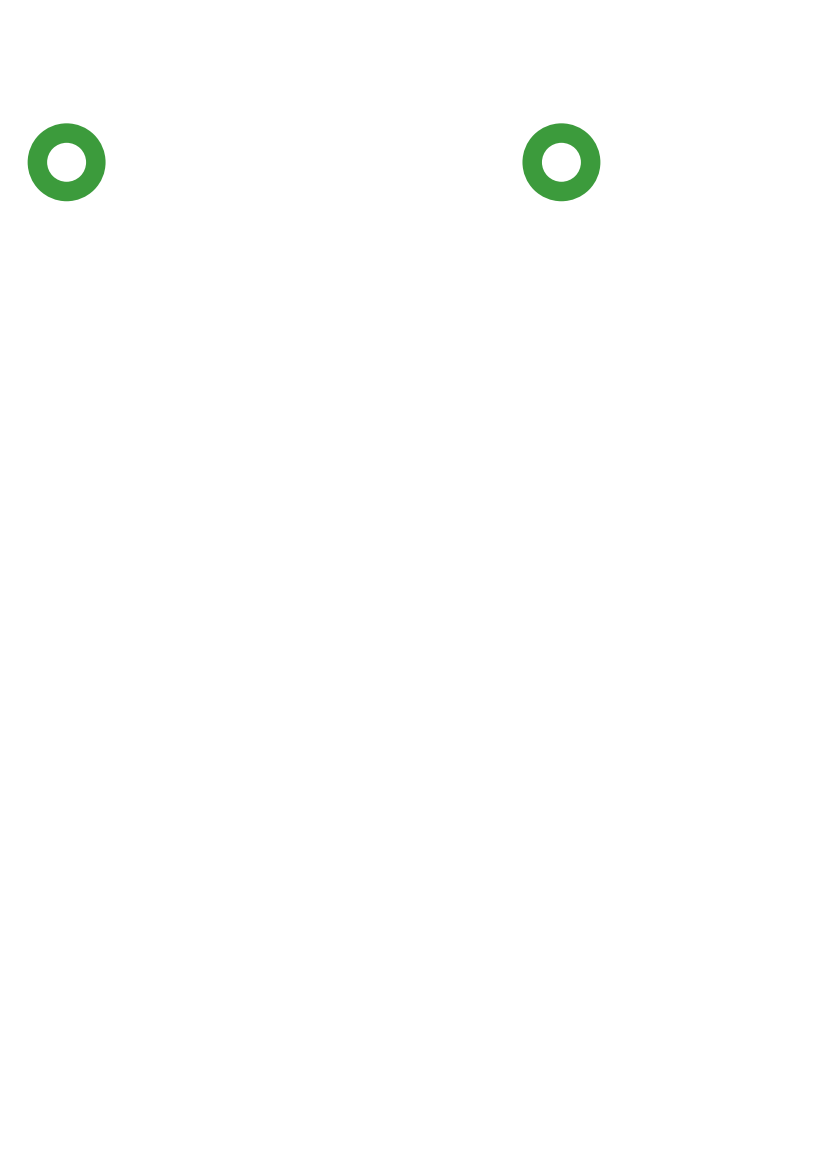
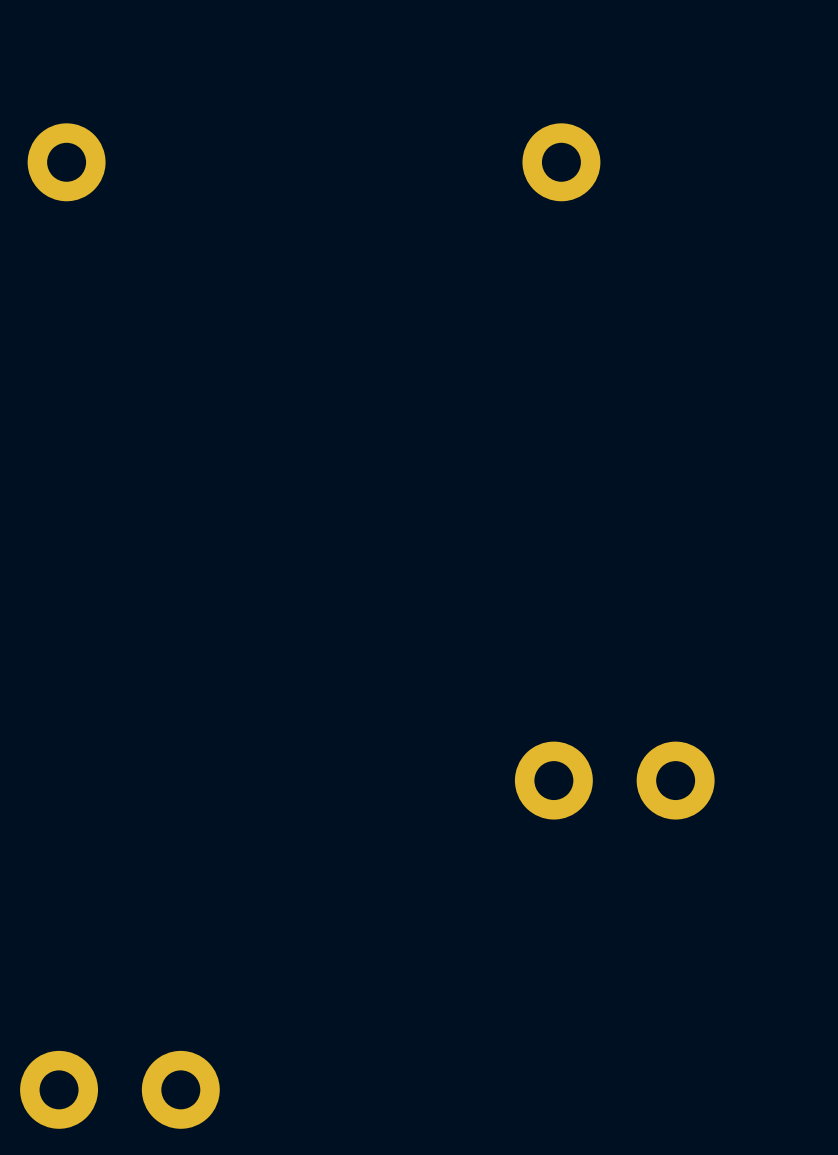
part: none -> (614, 780)
part: none -> (119, 1089)

